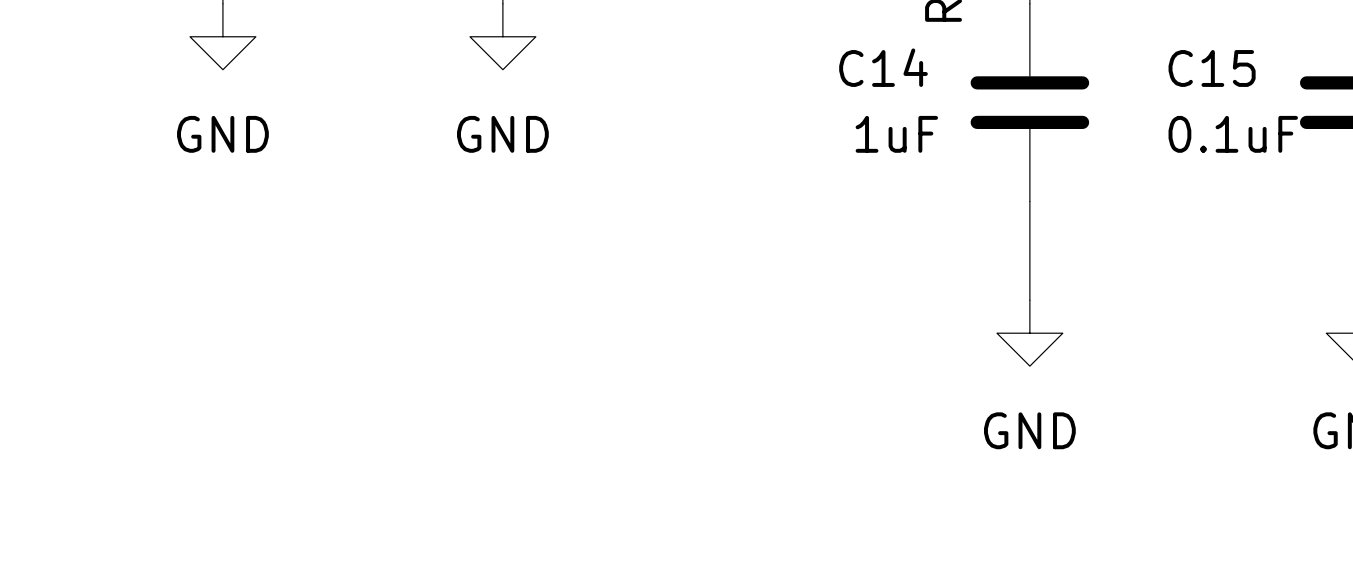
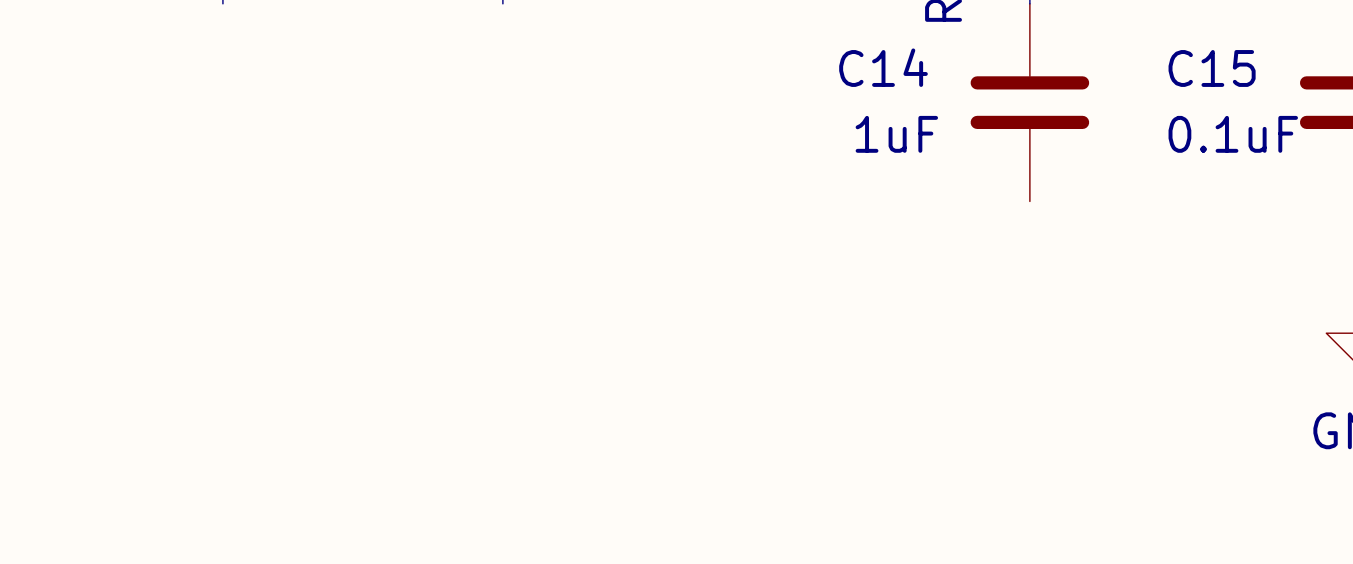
power symbol: GND (222, 36) -> none
power symbol: GND (502, 36) -> none
wire: (1029, 201) (1029, 300) -> none
power symbol: GND (1029, 333) -> none

